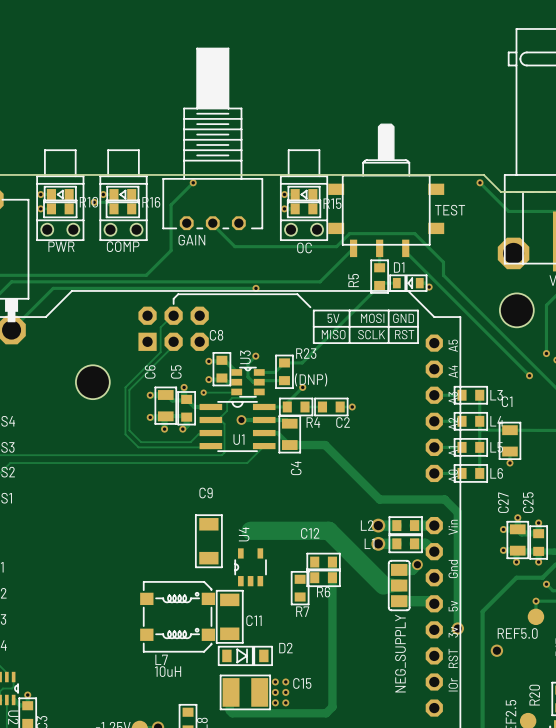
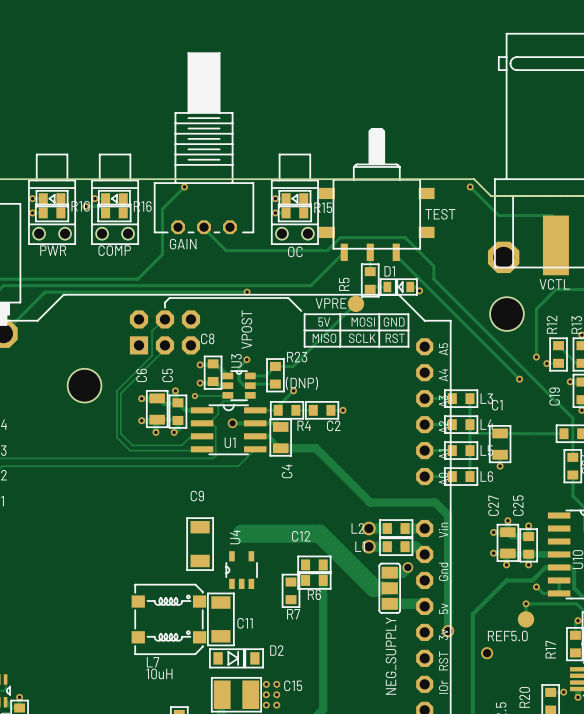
VPRE: none -> (355, 303)
text: none -> VPOST (246, 329)

